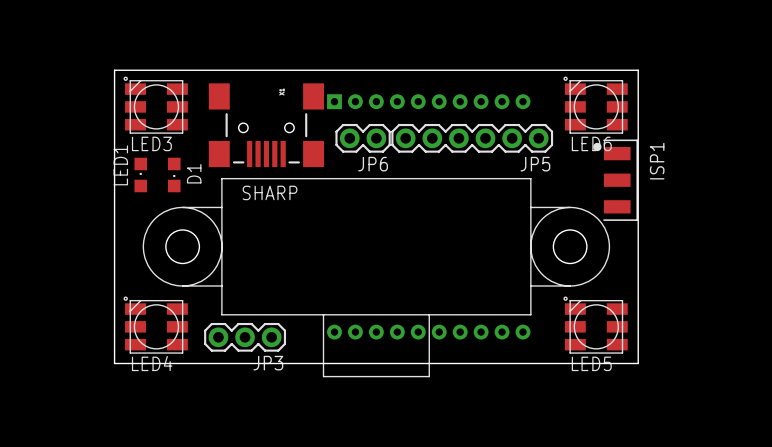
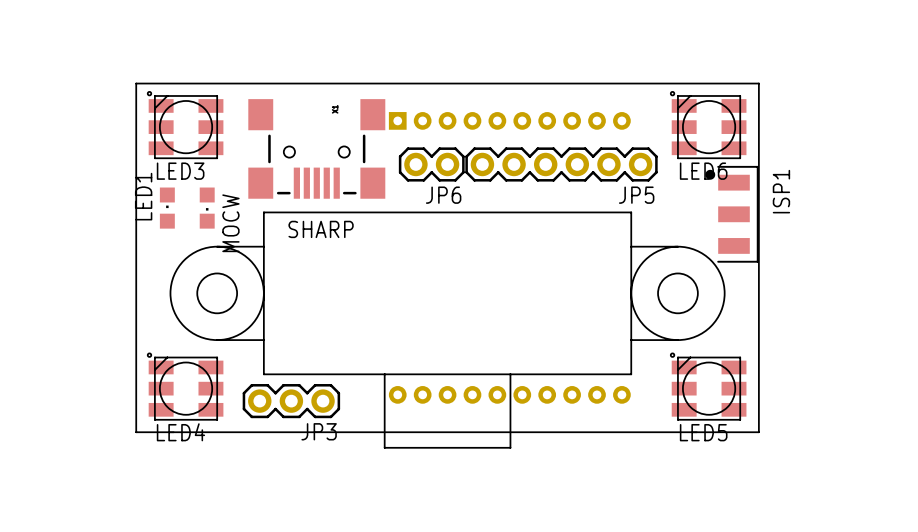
D1 name: D1 (194, 173) -> MOCW (230, 223)

